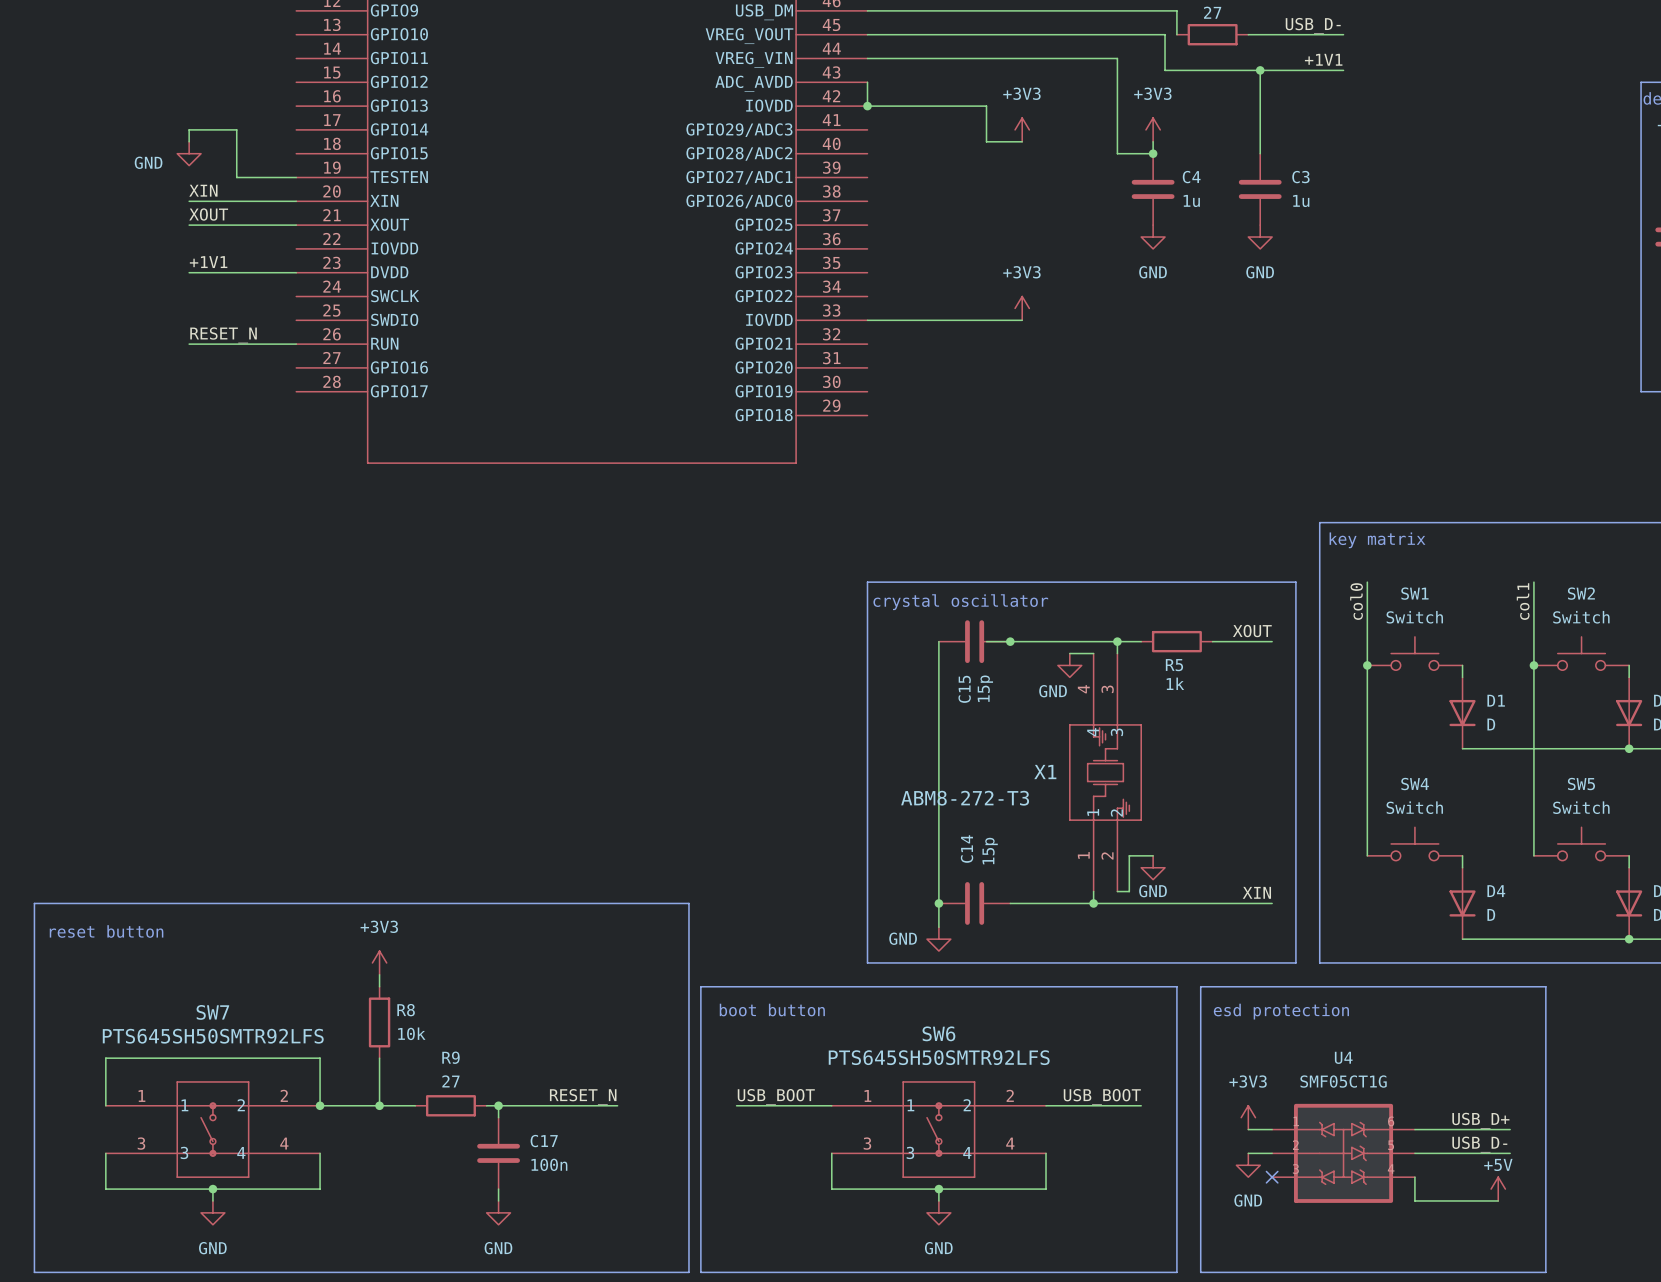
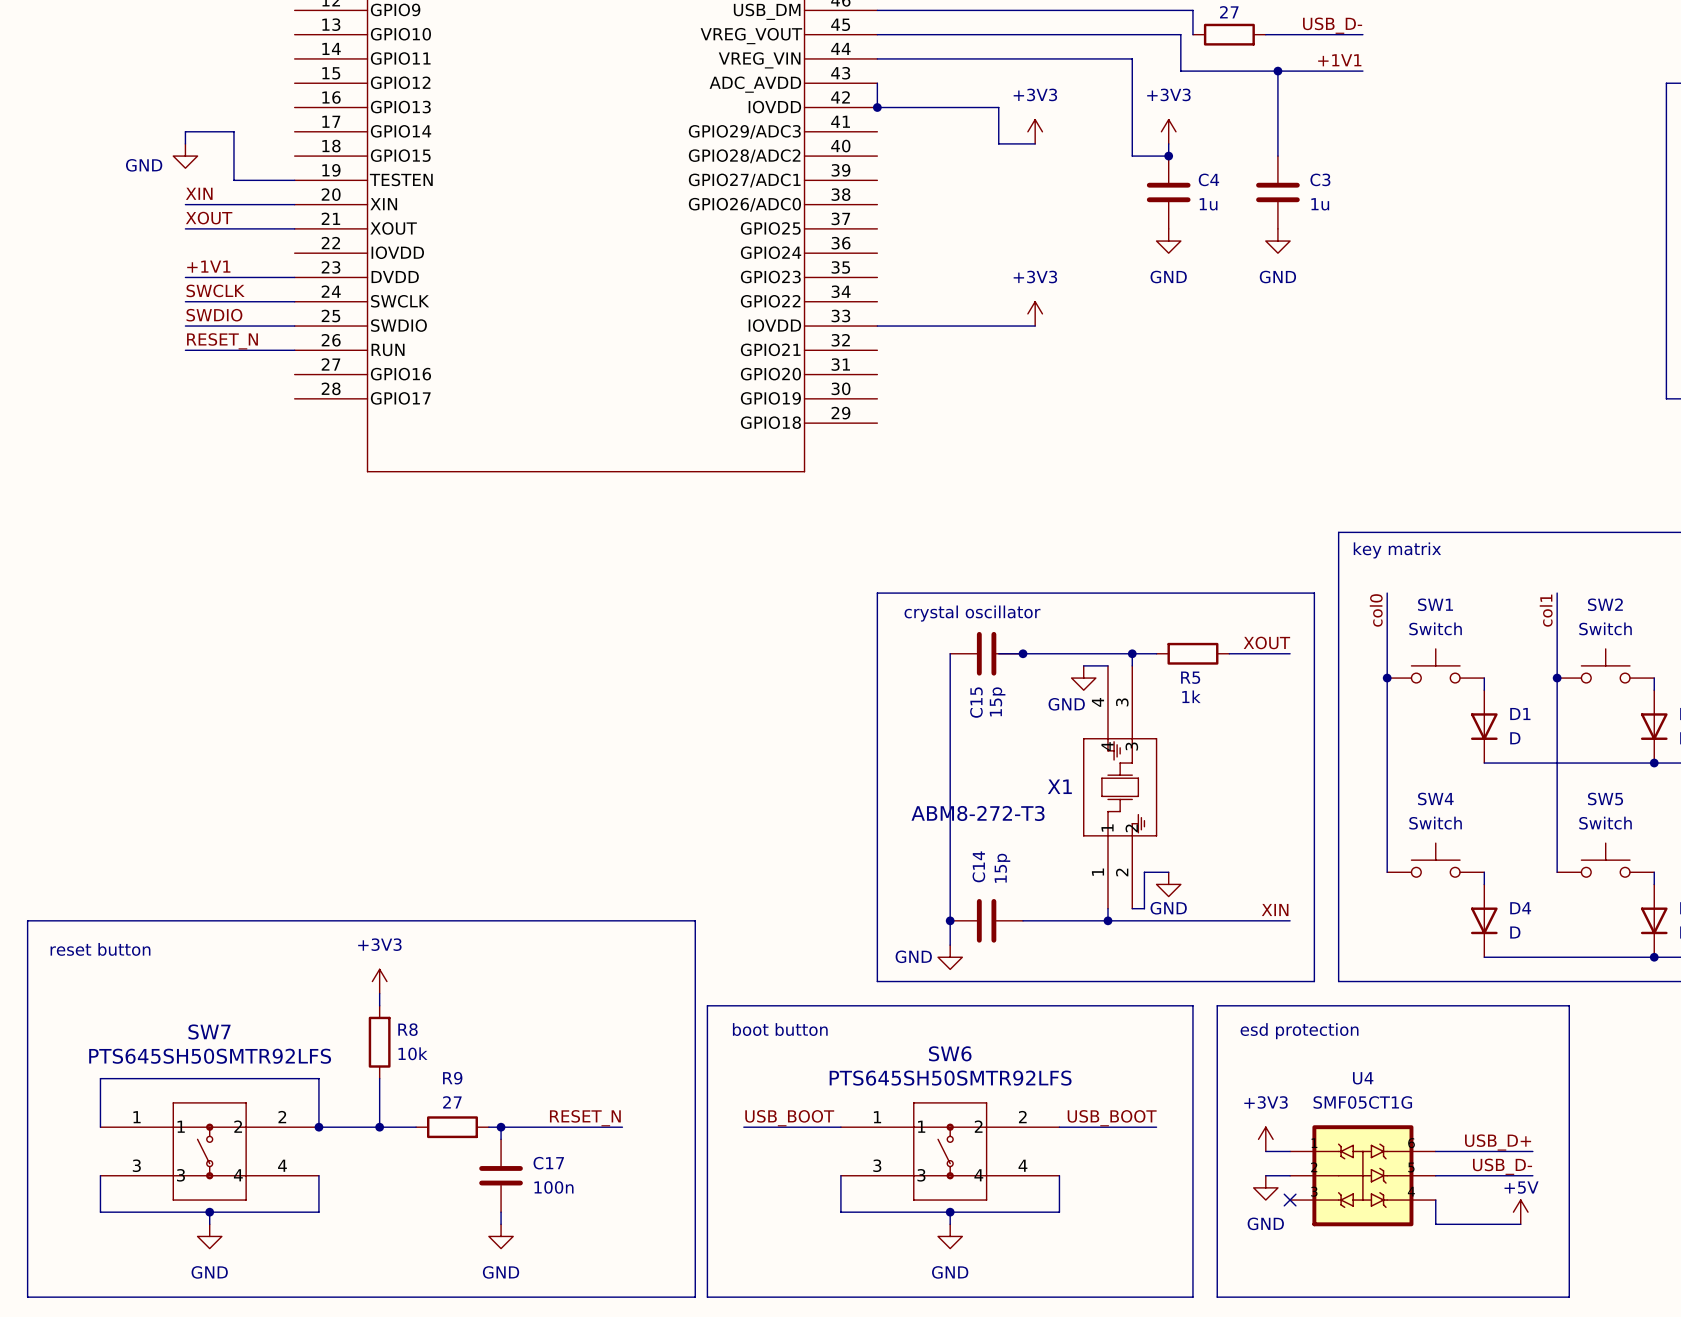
label: none -> SWCLK (215, 290)
wire: none -> (185, 301) (294, 301)
label: none -> SWDIO (214, 315)
wire: none -> (185, 326) (294, 326)

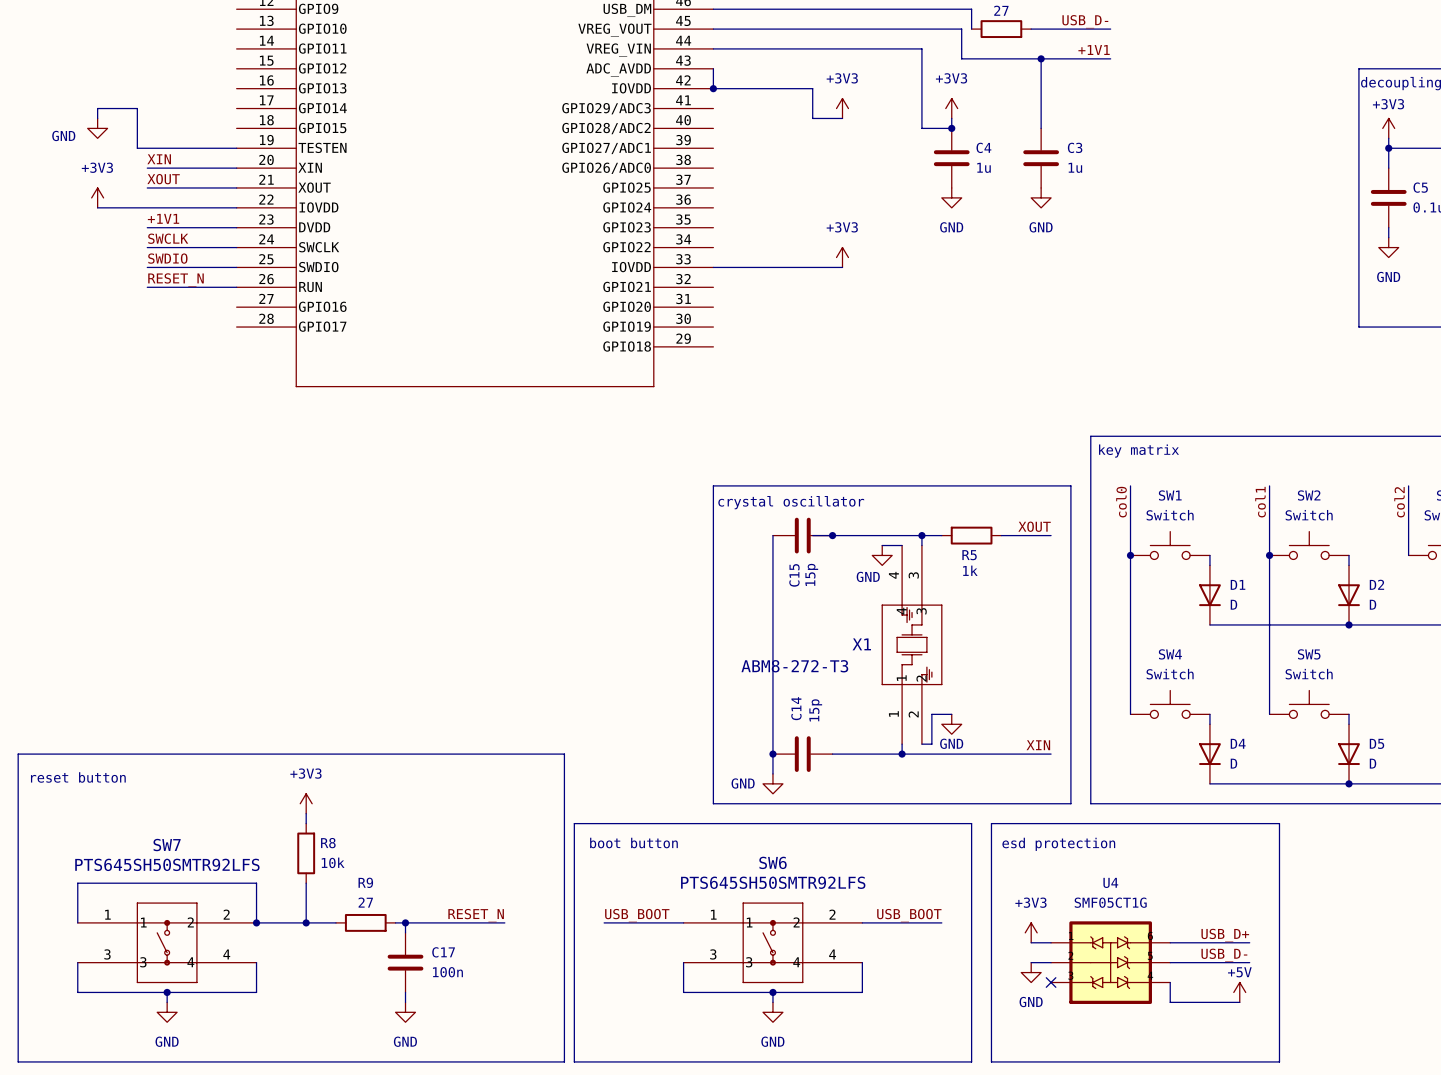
wire: (185, 143) (185, 131) (233, 131) (233, 180) -> (97, 118) (97, 108) (137, 108) (137, 148) (187, 148)
power symbol position: GND (185, 156) -> GND (97, 128)
power symbol: none -> +3V3 (97, 197)
wire: none -> (97, 207) (236, 207)

